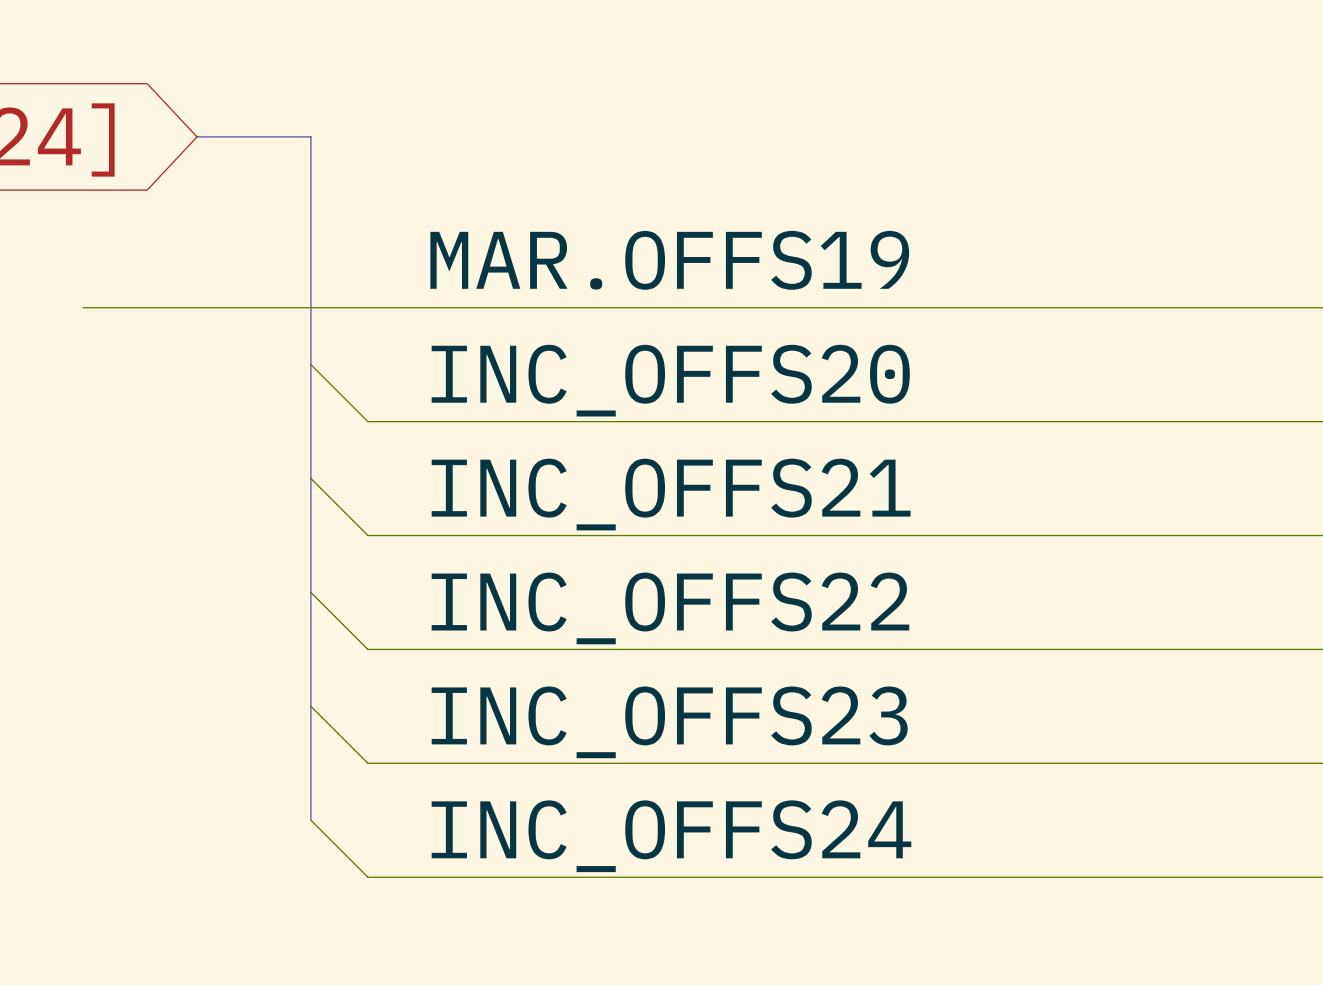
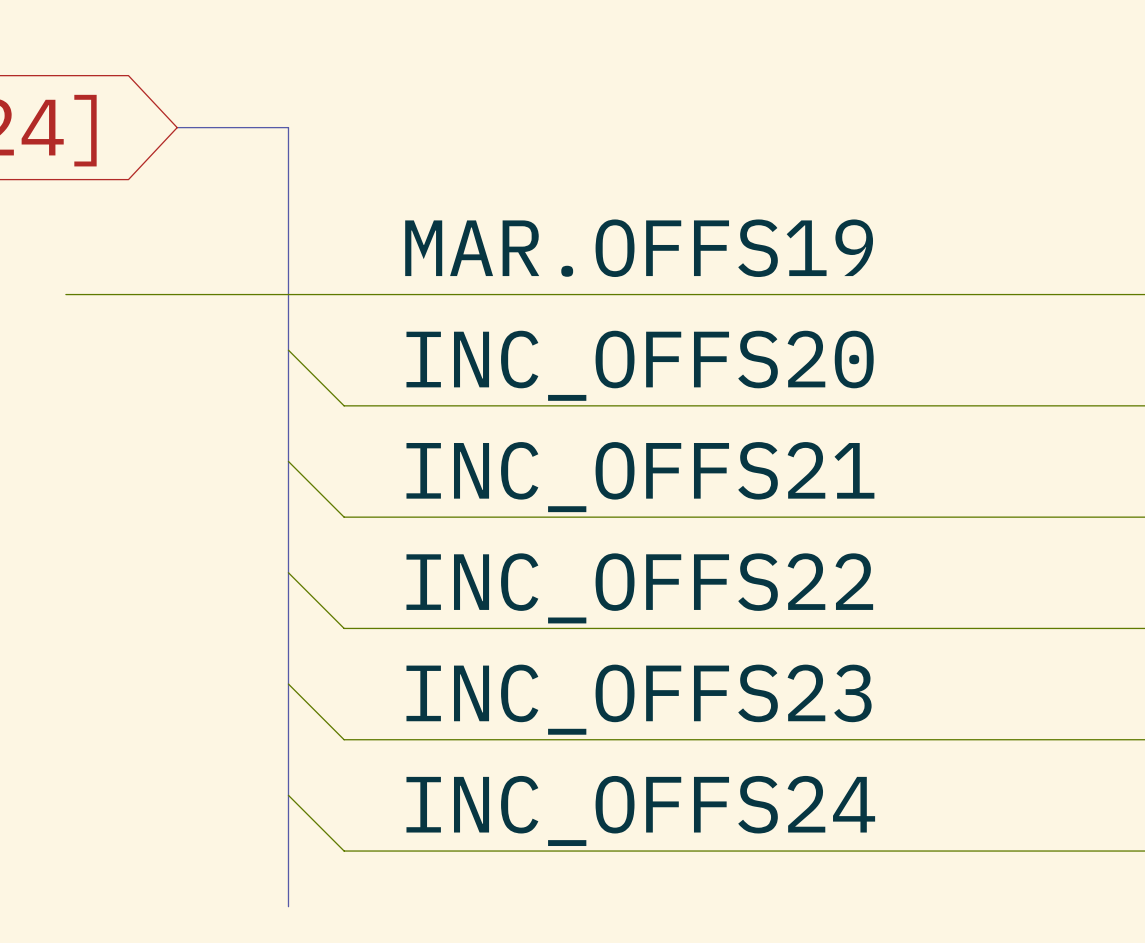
bus: none -> (288, 795) (288, 906)

